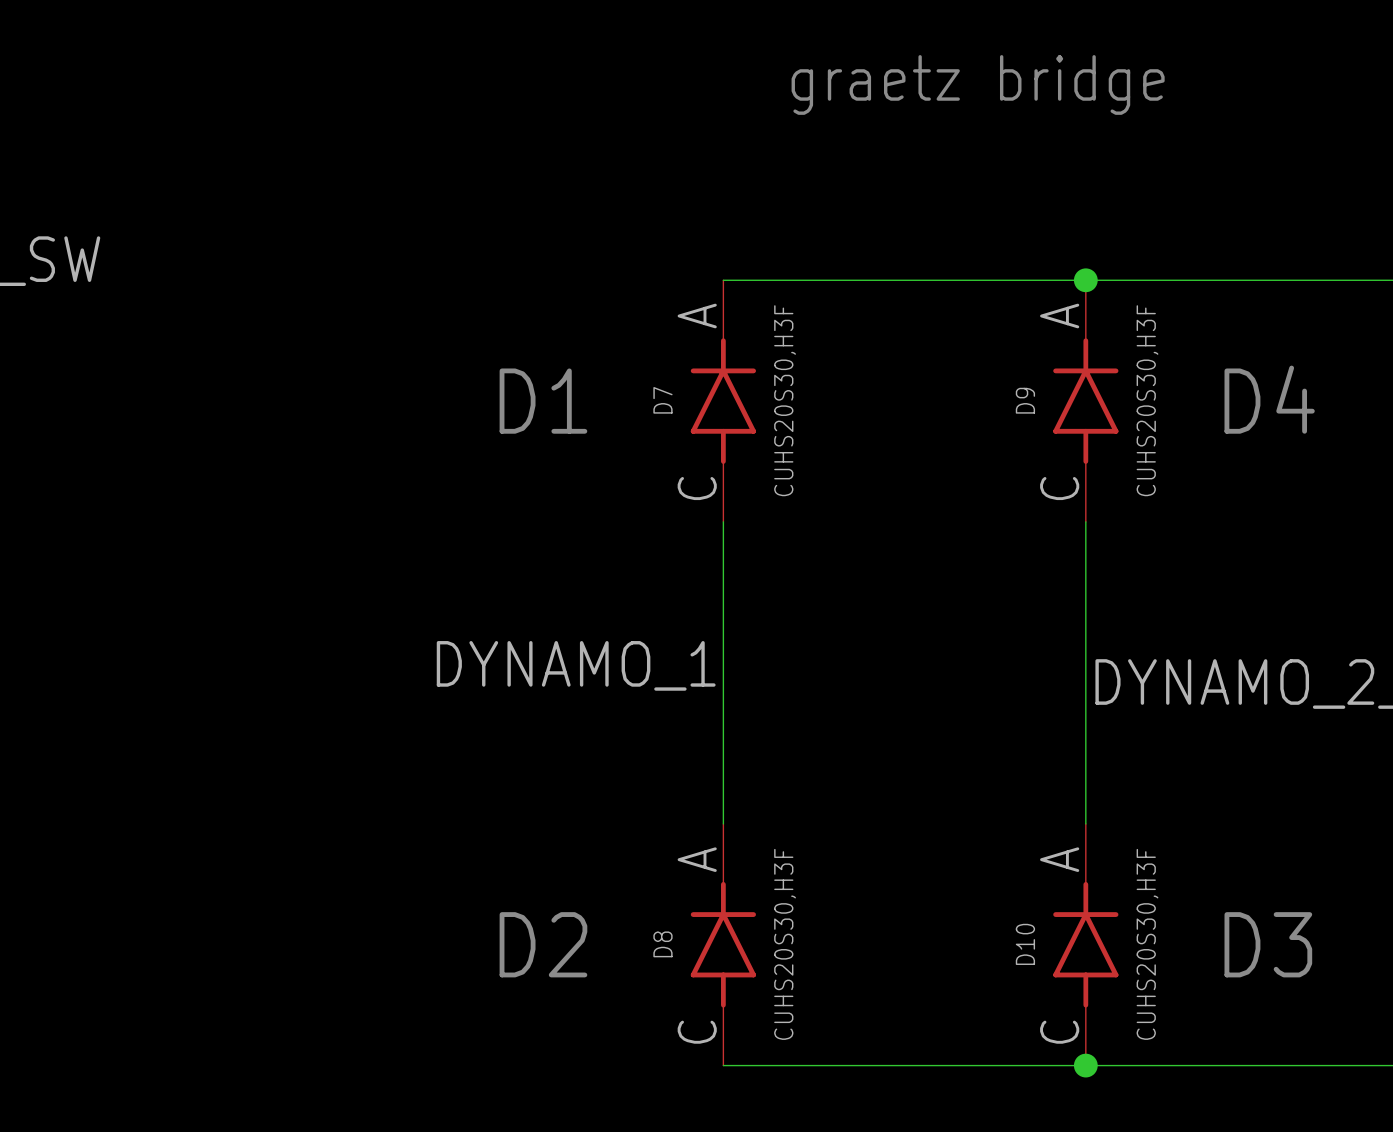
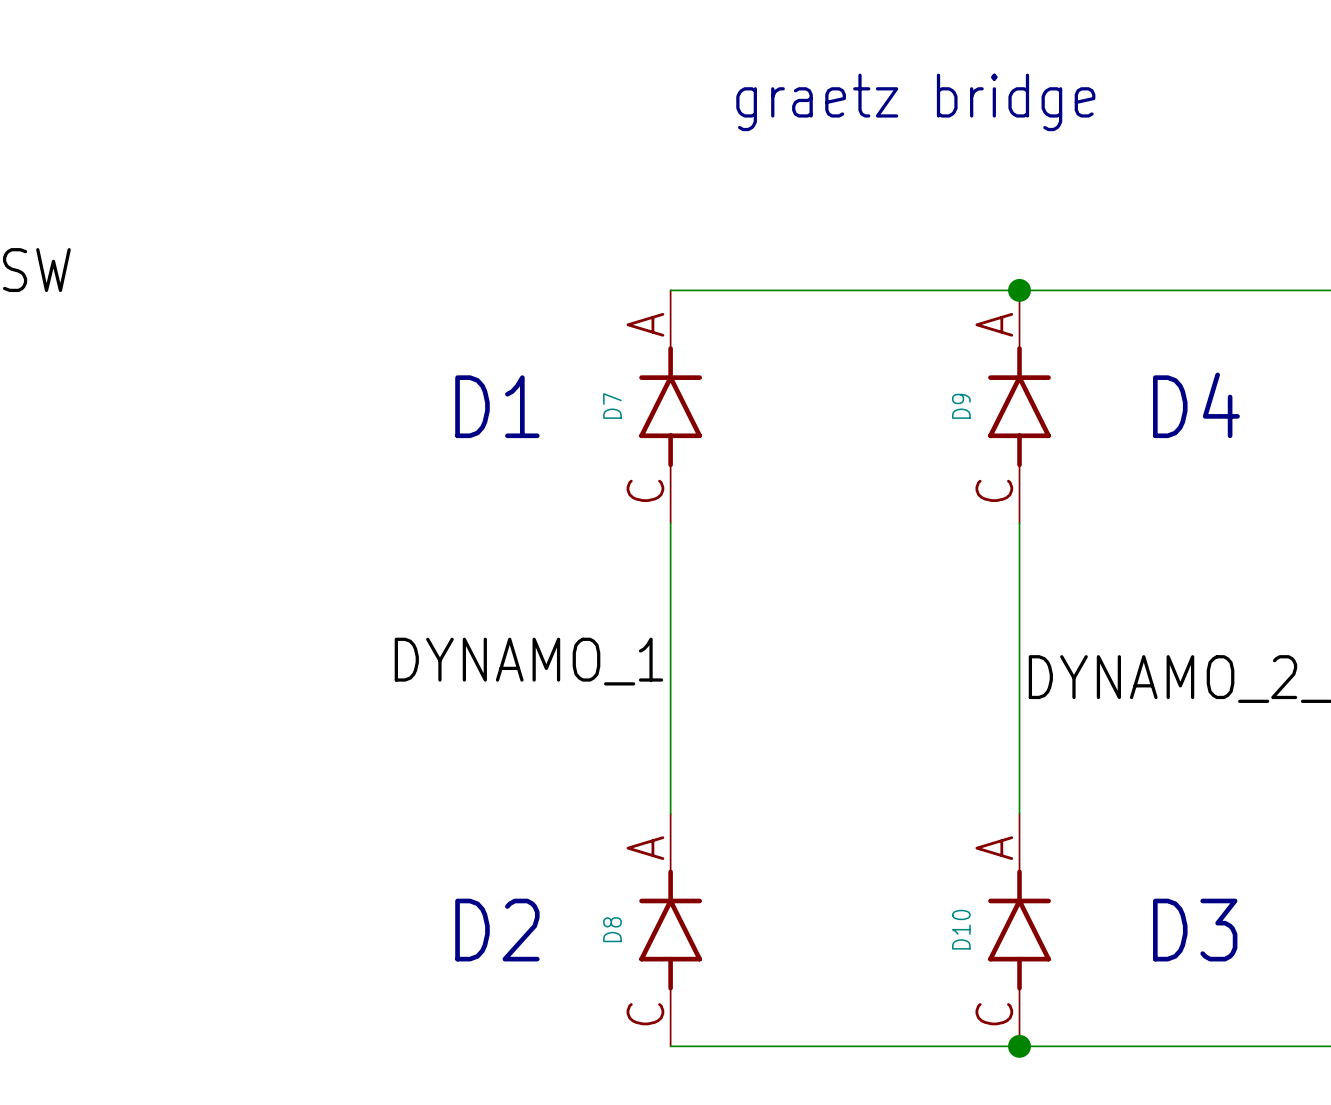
D7 value: CUHS20S30,H3F (785, 400) -> none
D9 value: CUHS20S30,H3F (1147, 400) -> none
D8 value: CUHS20S30,H3F (785, 944) -> none
D10 value: CUHS20S30,H3F (1147, 944) -> none

